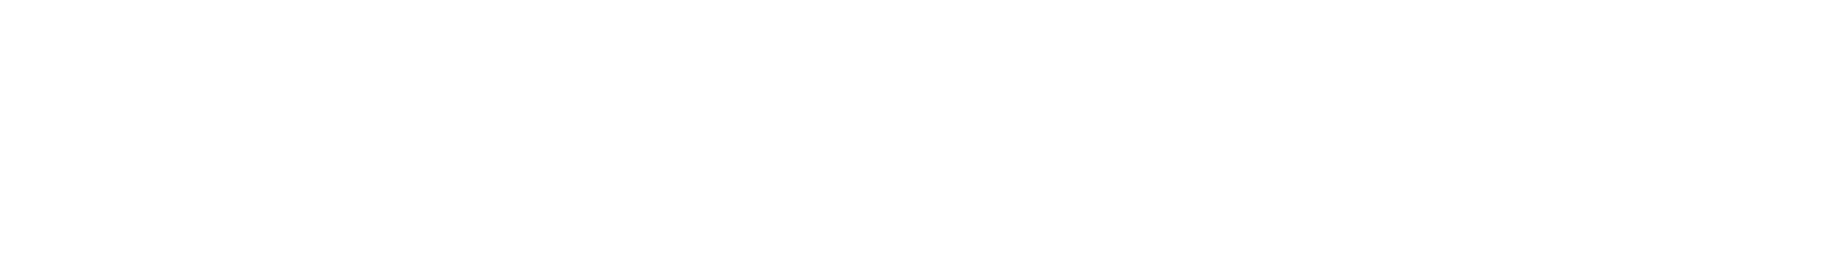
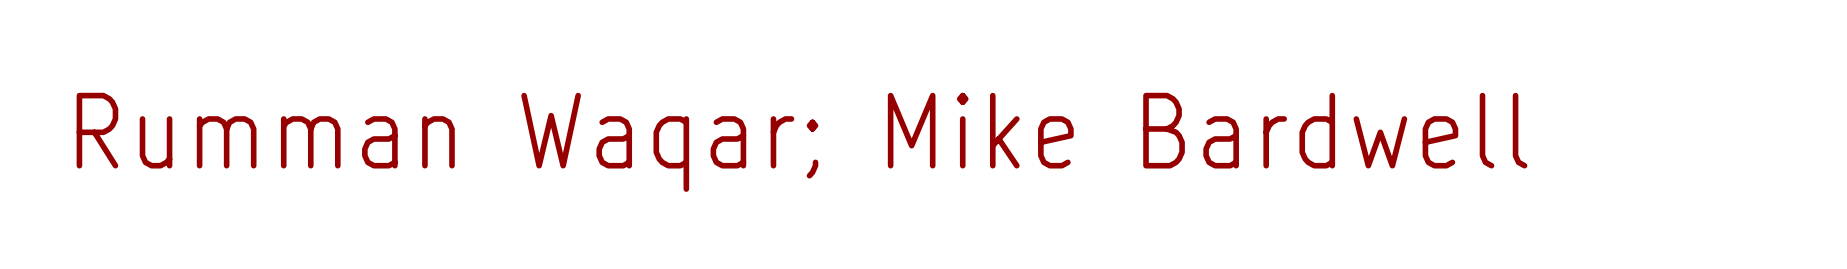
text: none -> Rumman Waqar; Mike Bardwell (802, 142)

